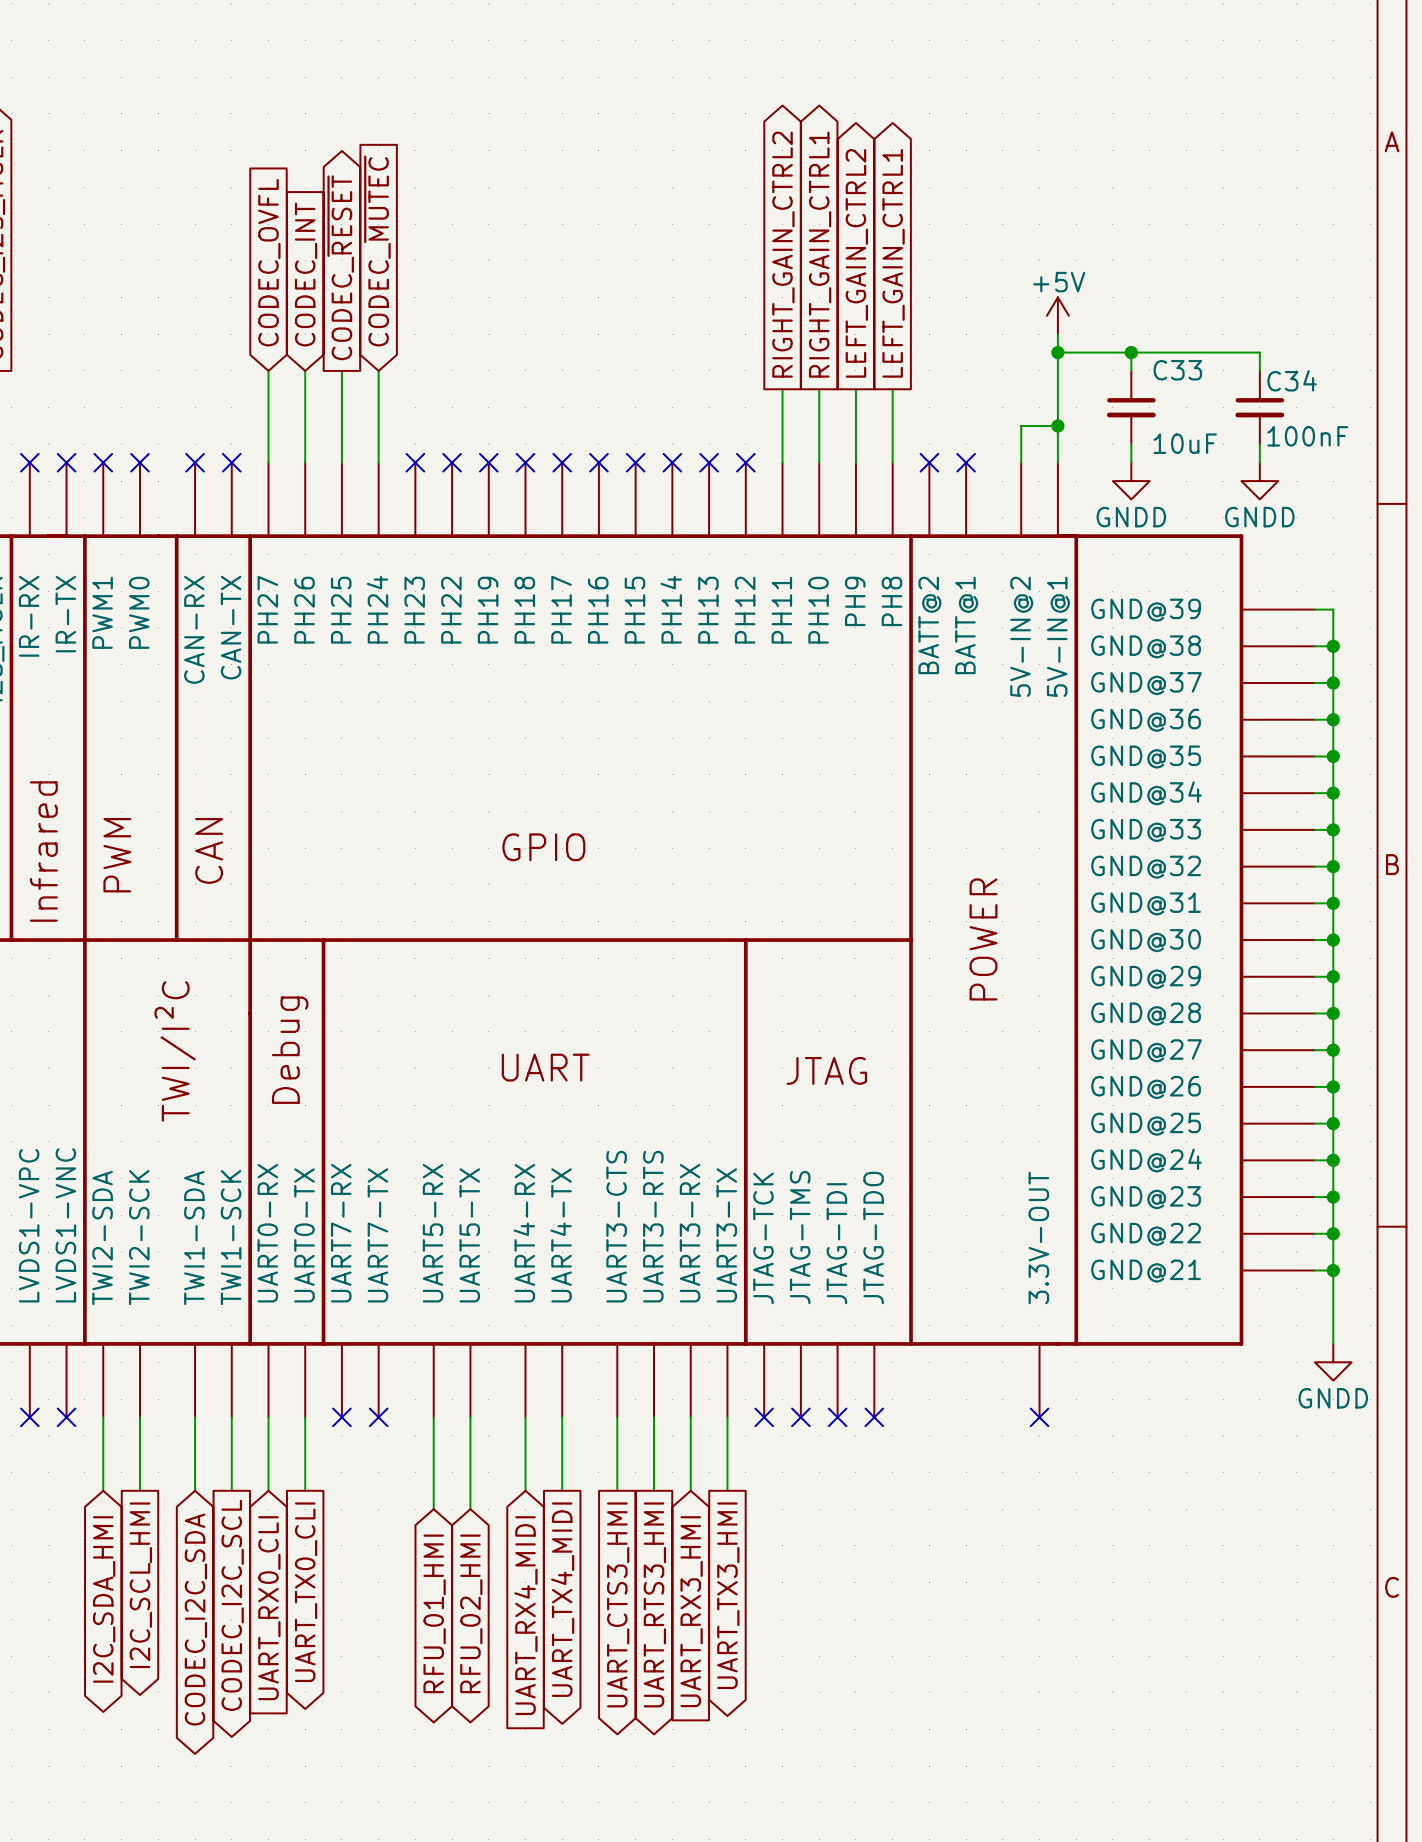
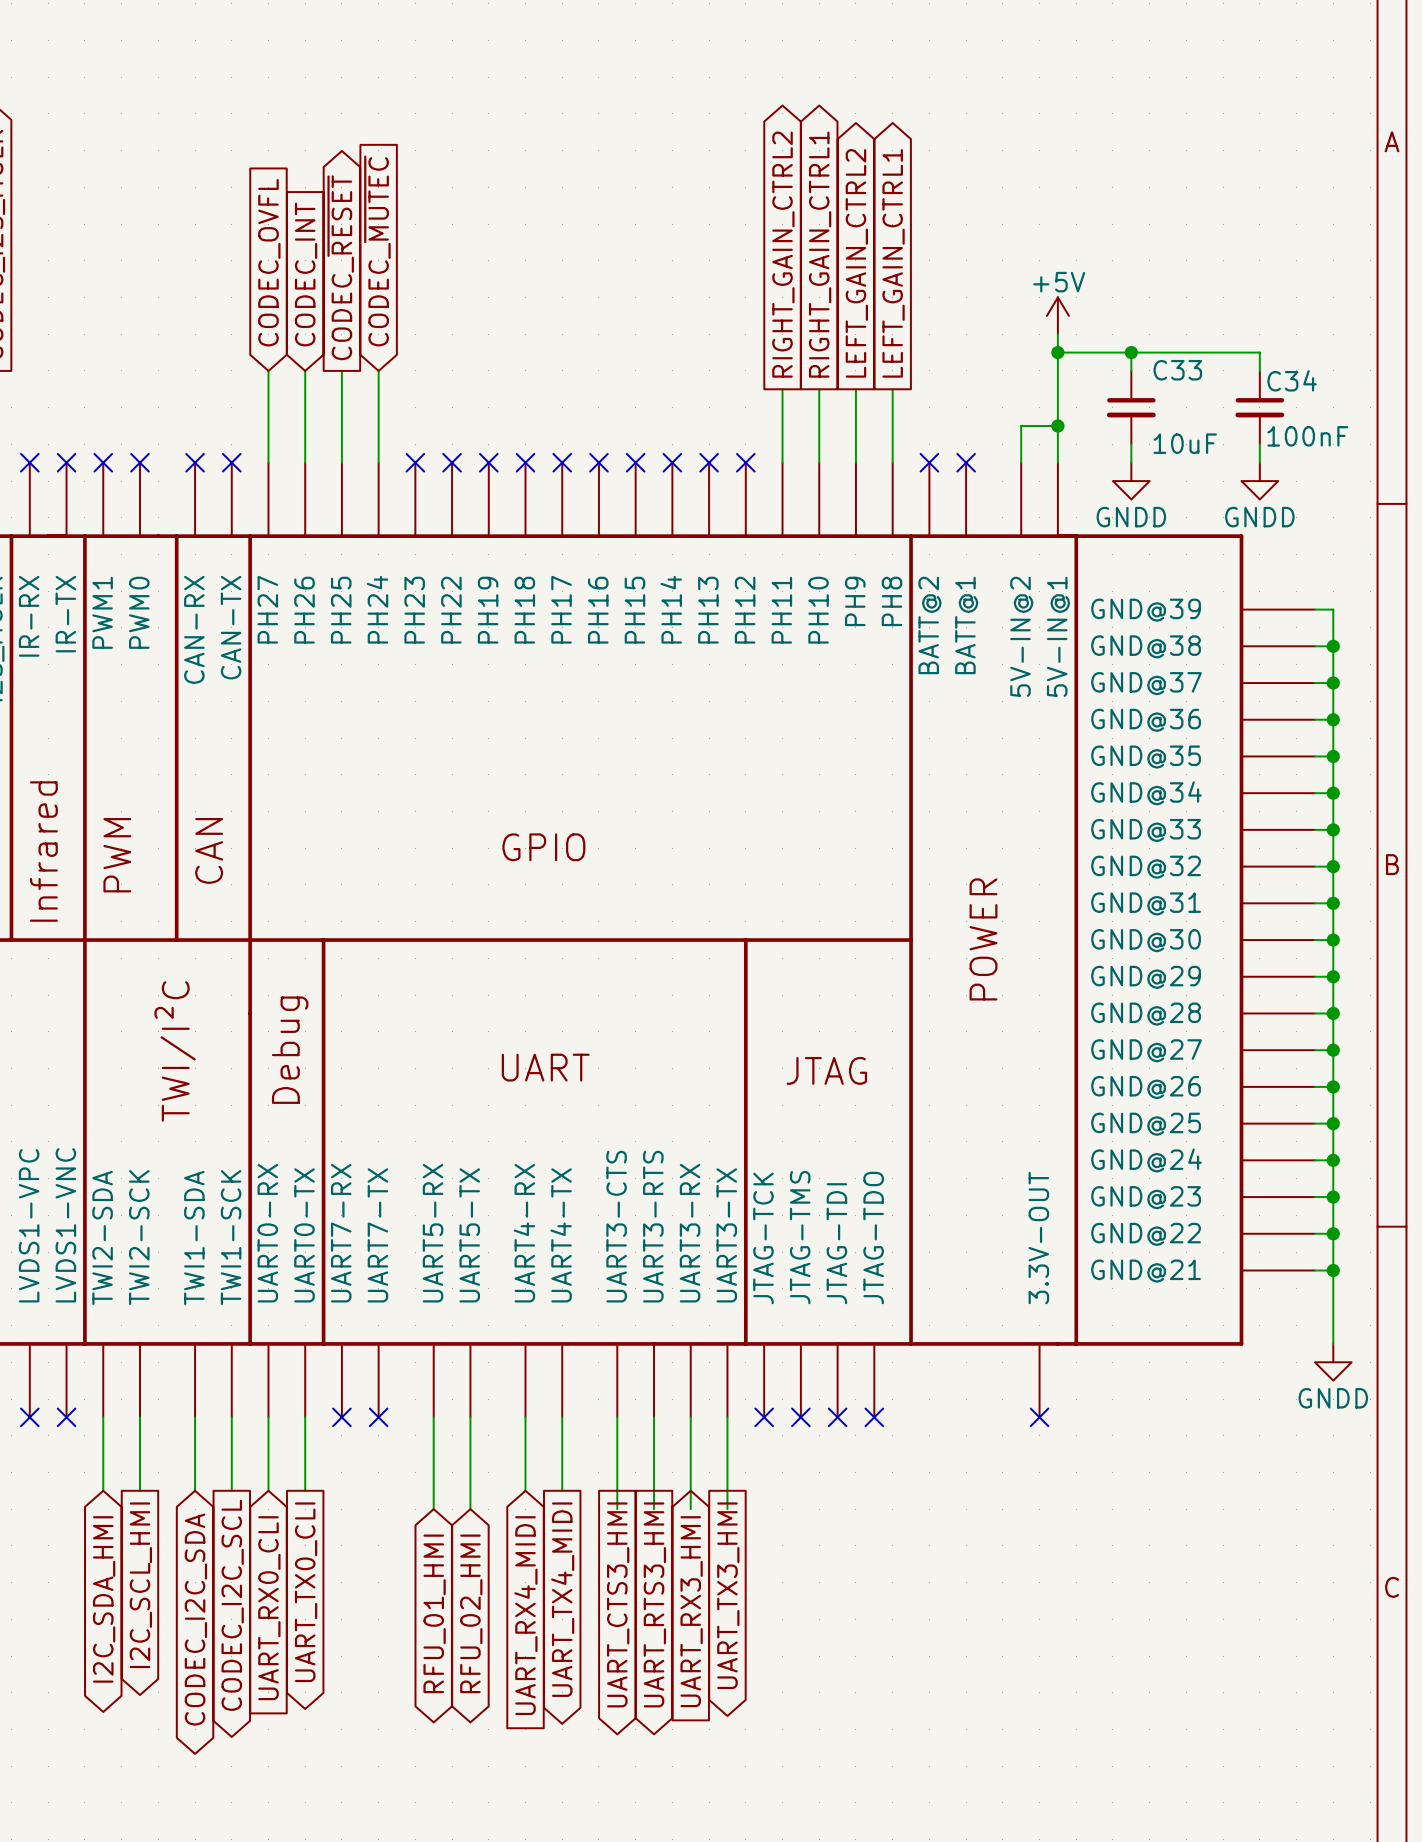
wire: none -> (617, 1490) (617, 1509)
wire: none -> (654, 1490) (654, 1509)
wire: none -> (690, 1490) (690, 1509)
wire: none -> (727, 1490) (727, 1509)

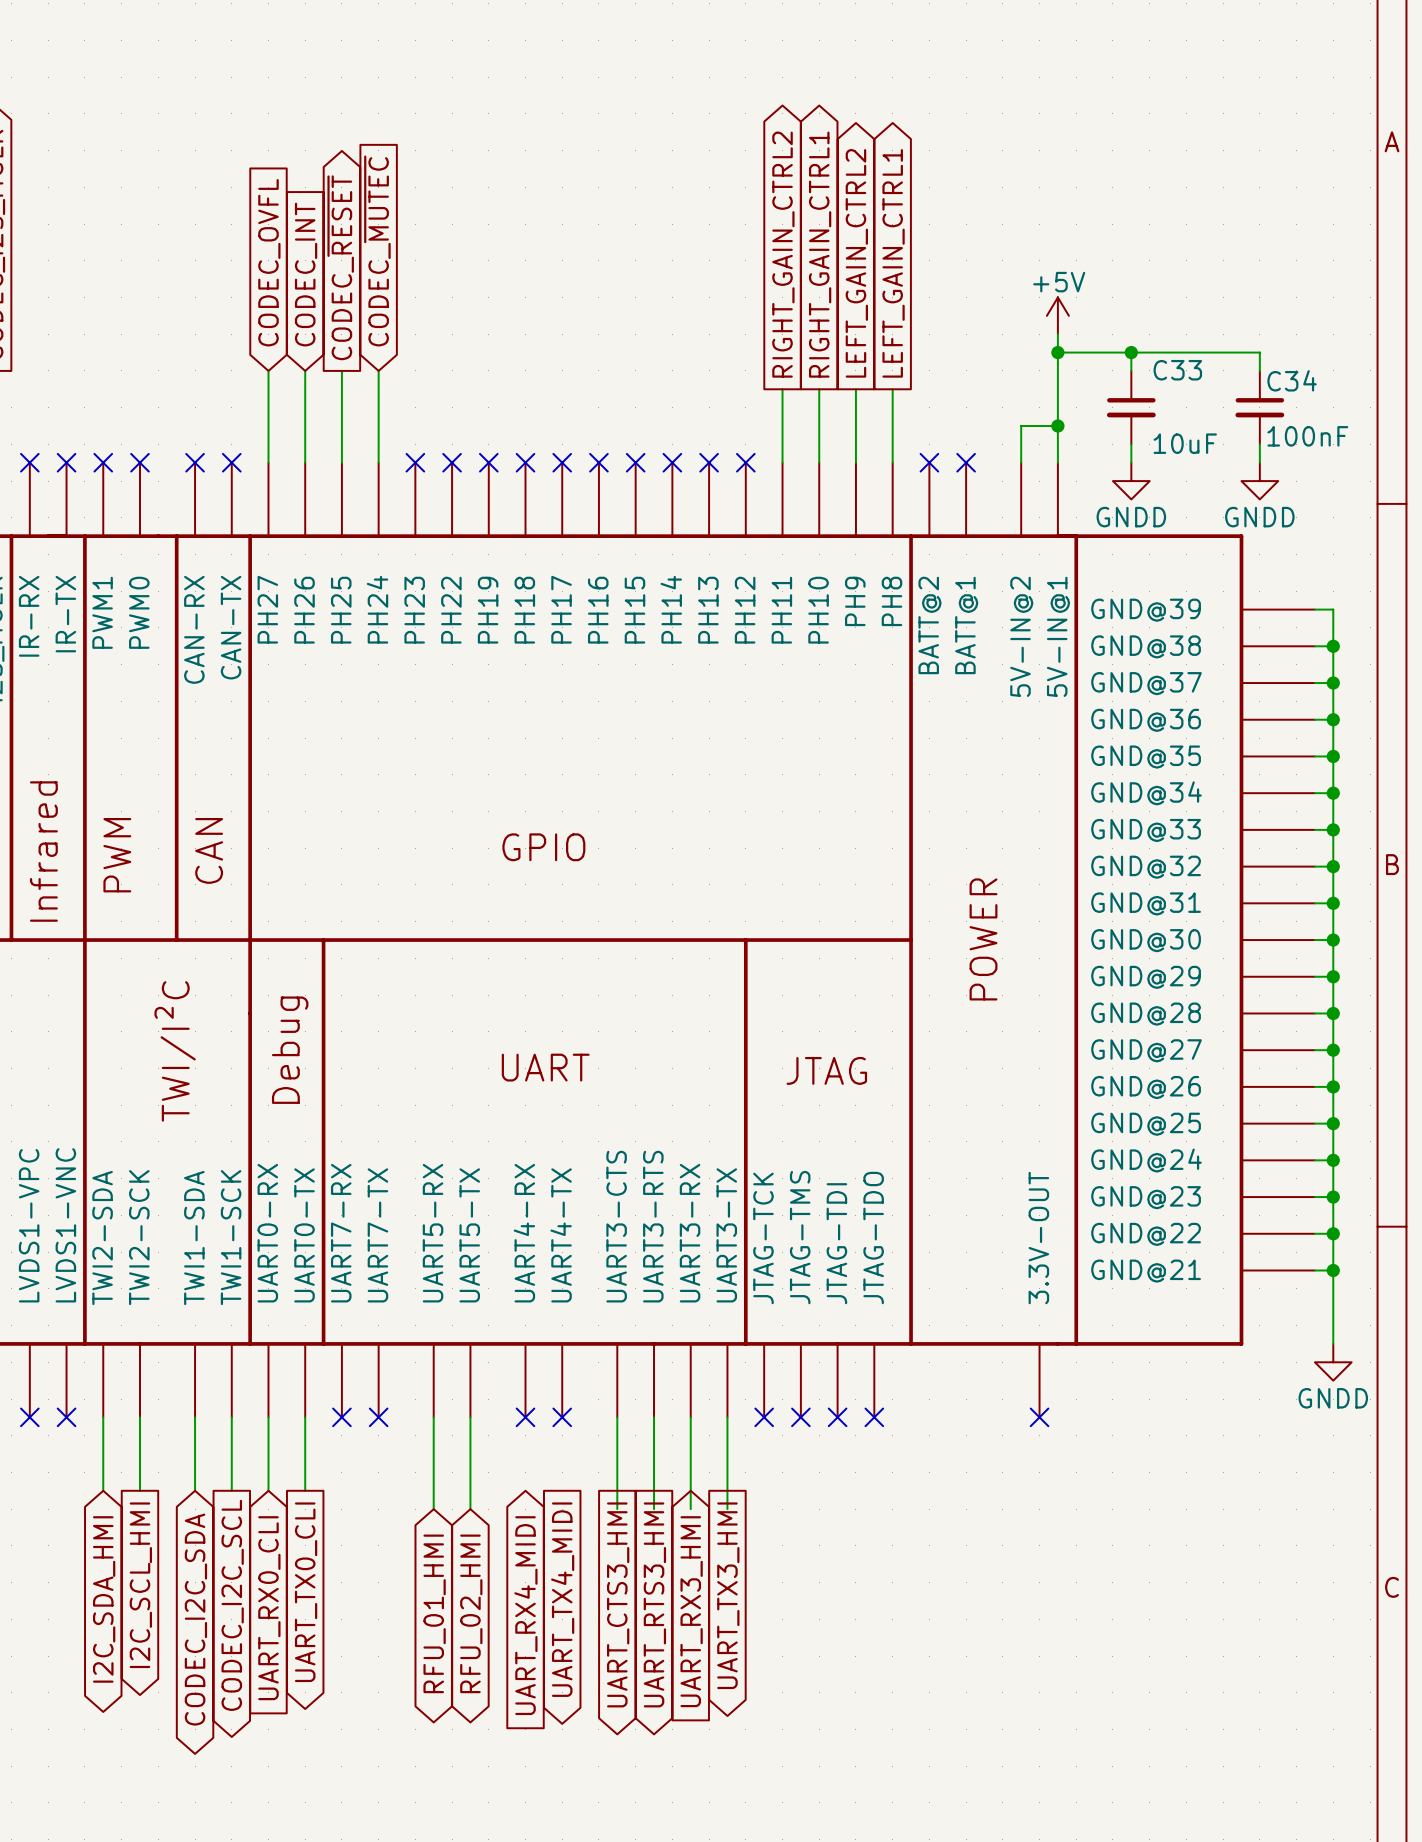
wire: (525, 1417) (525, 1490) -> none
no-connect mark: none -> (525, 1417)
wire: (562, 1417) (562, 1490) -> none
no-connect mark: none -> (562, 1417)

